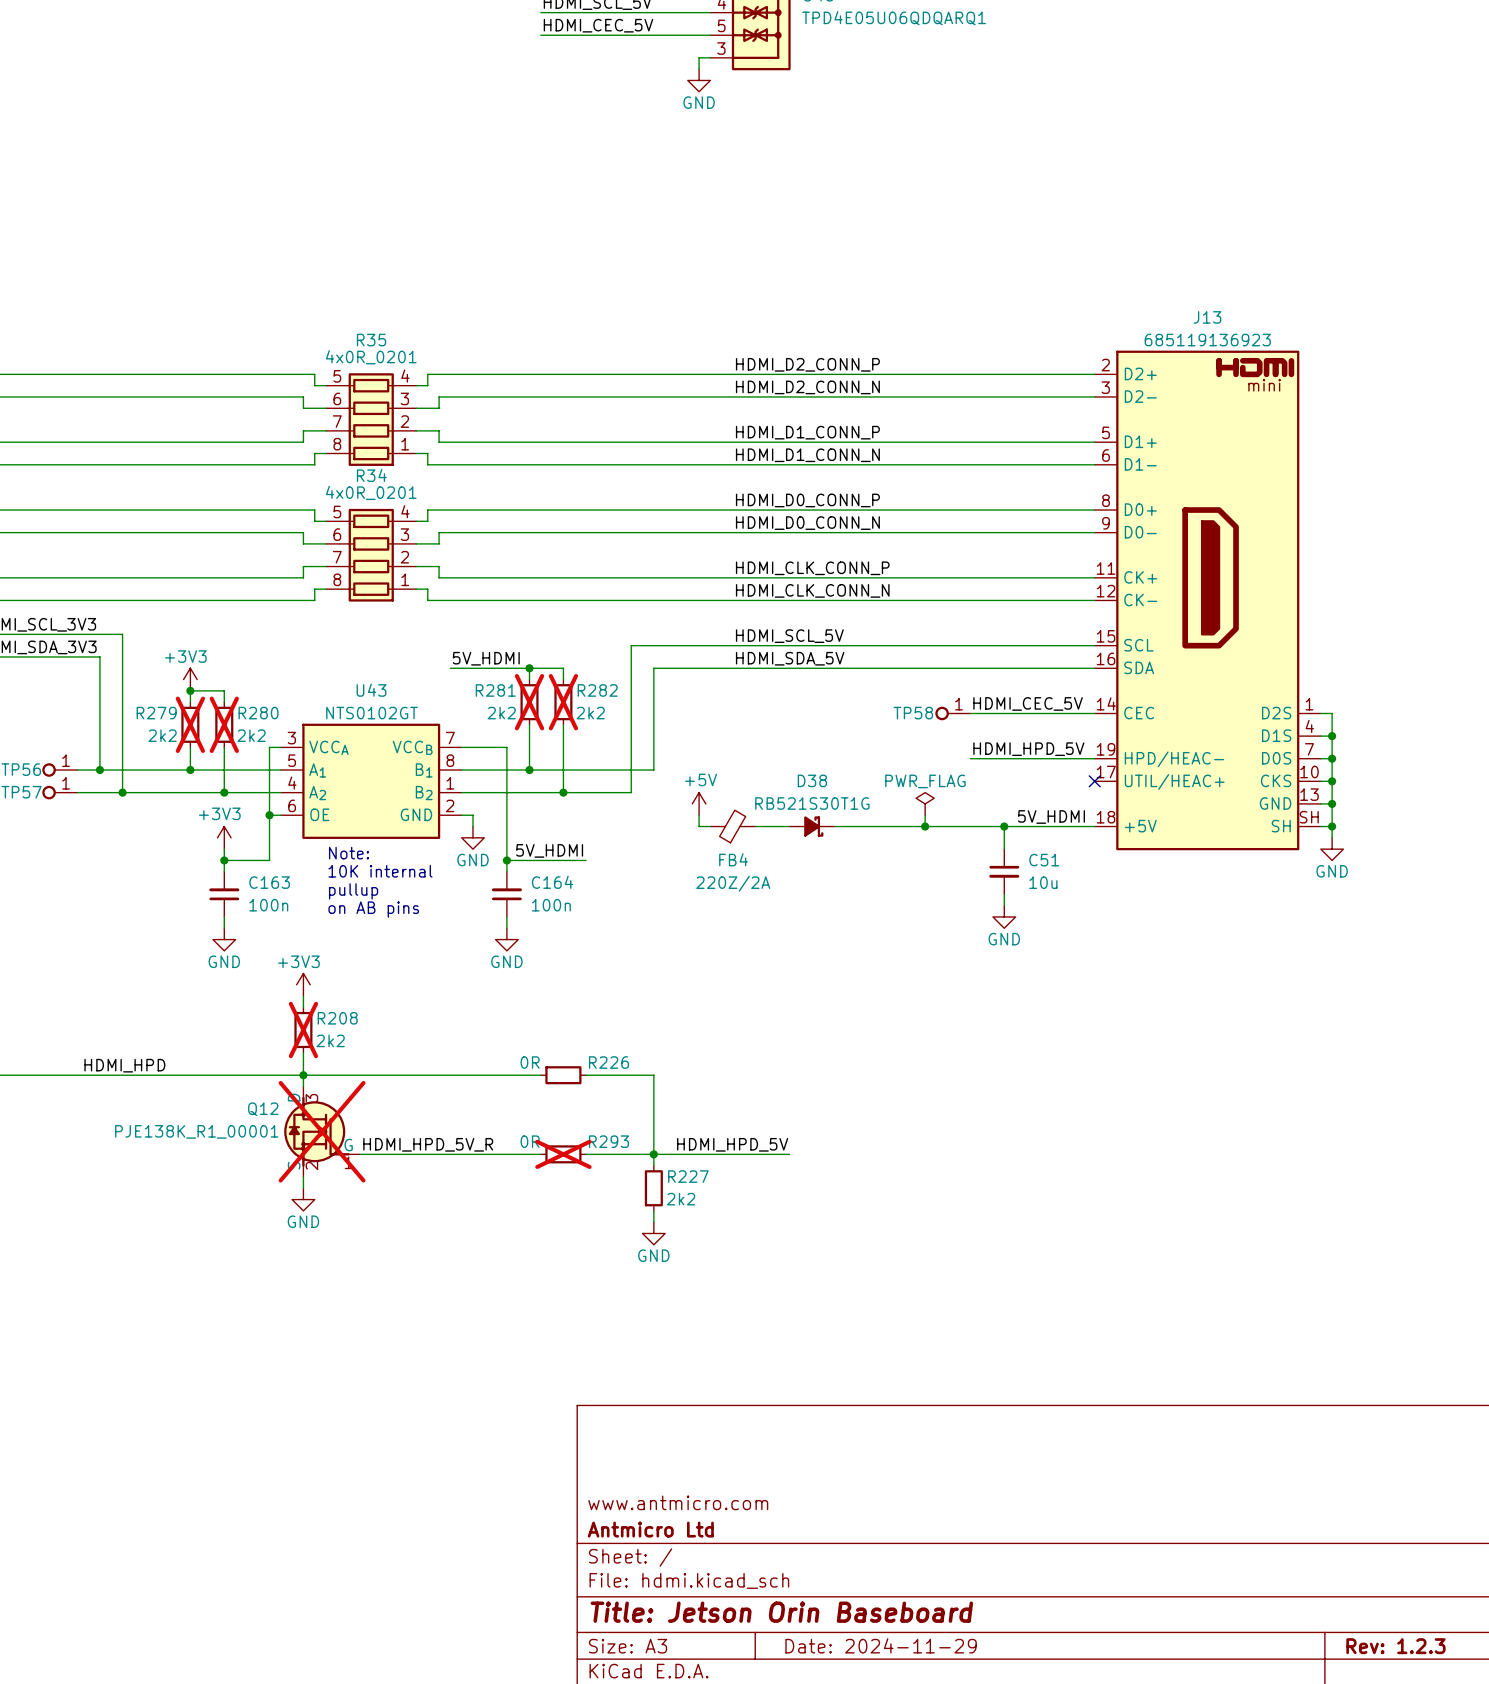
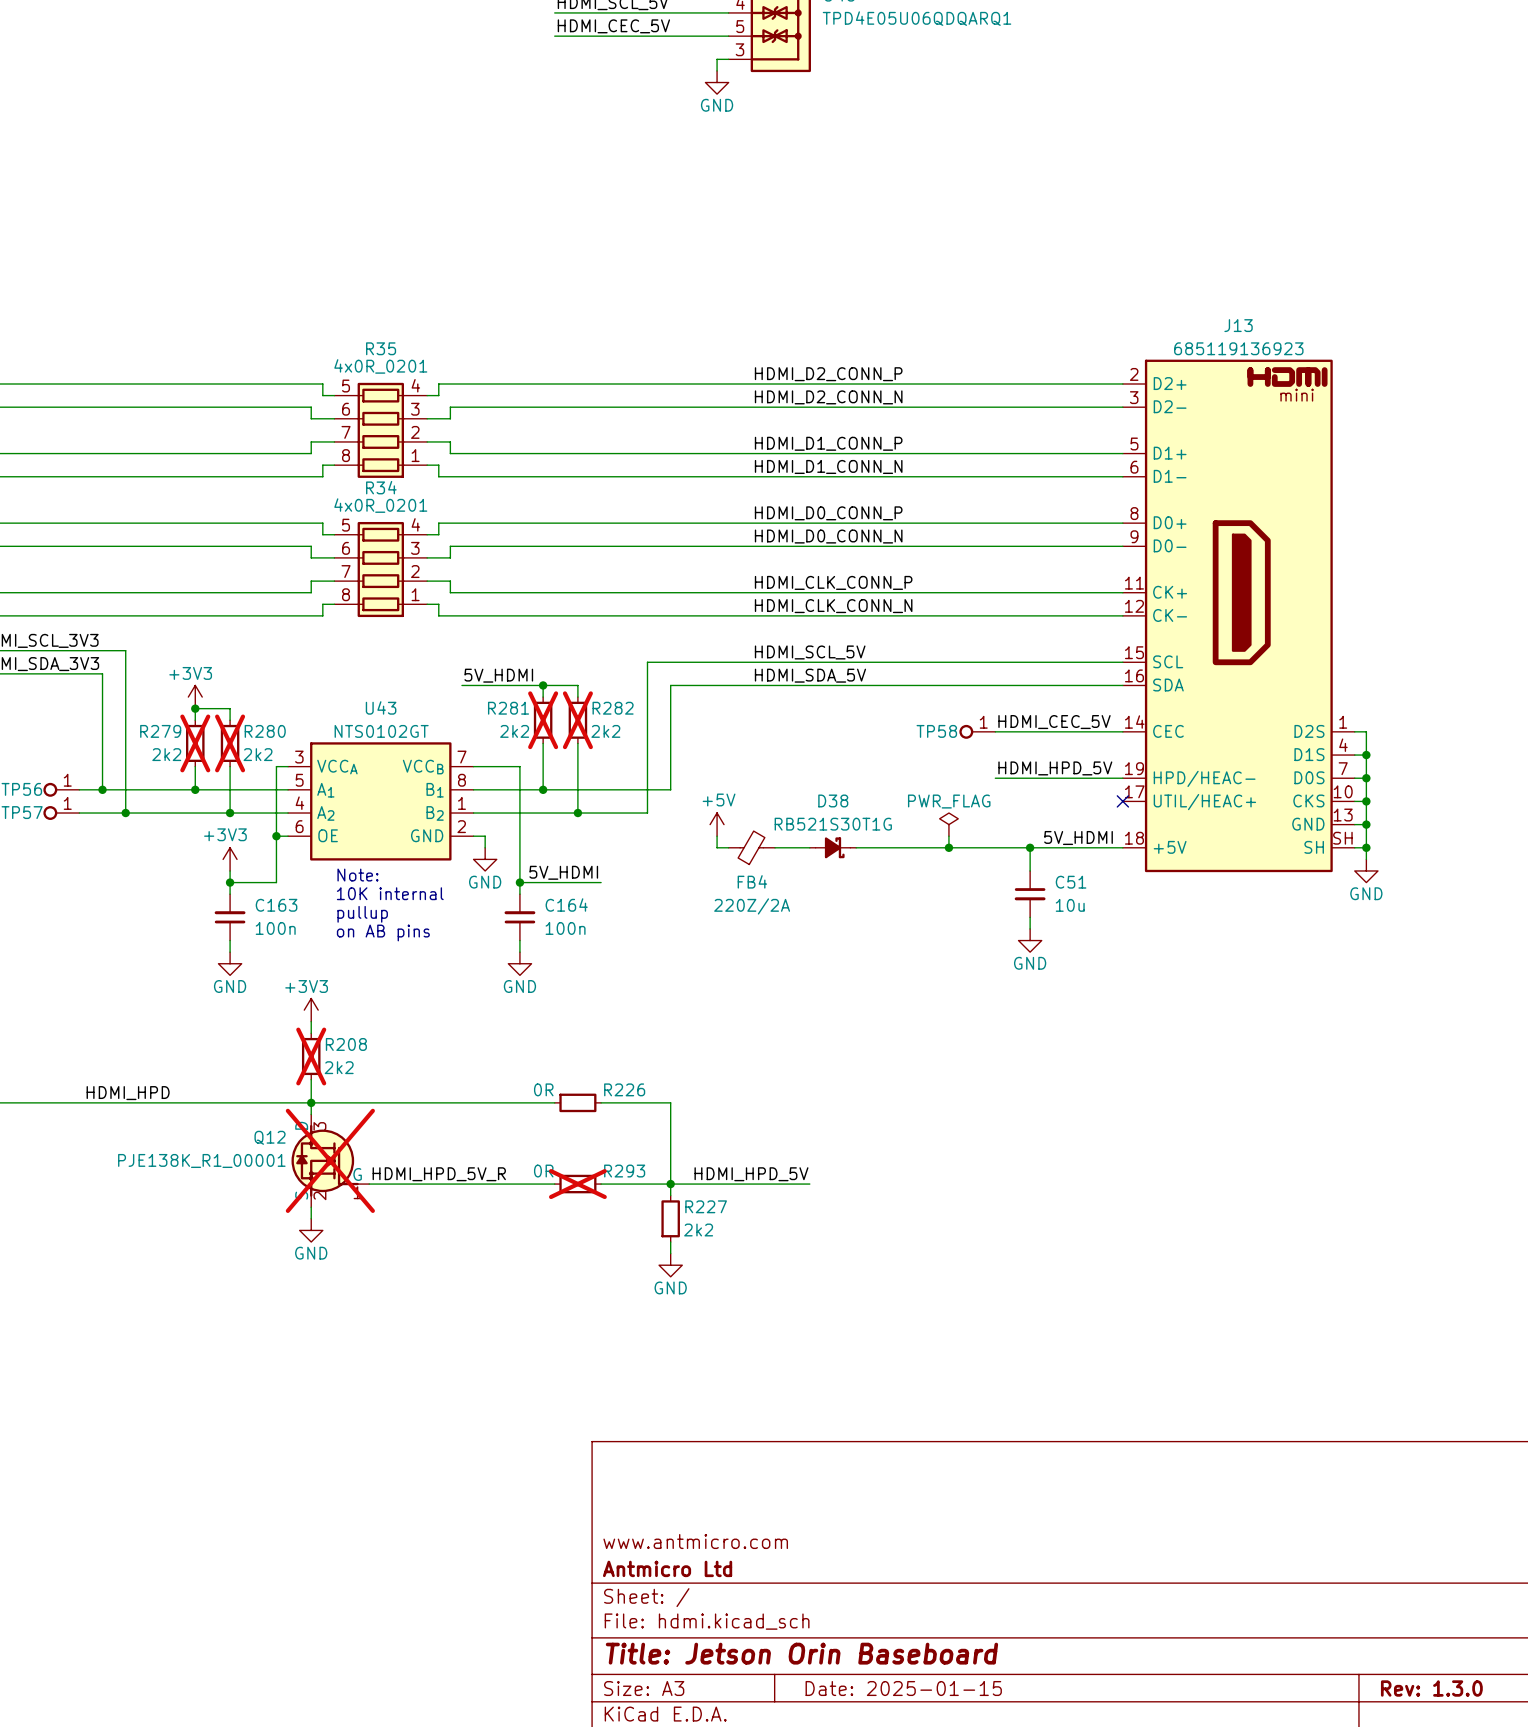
title block: Date: 2024-11-29 (881, 1645) -> Date: 2025-01-15 (903, 1688)
title block: Rev: 1.2.3 (1395, 1646) -> Rev: 1.3.0 (1431, 1688)

